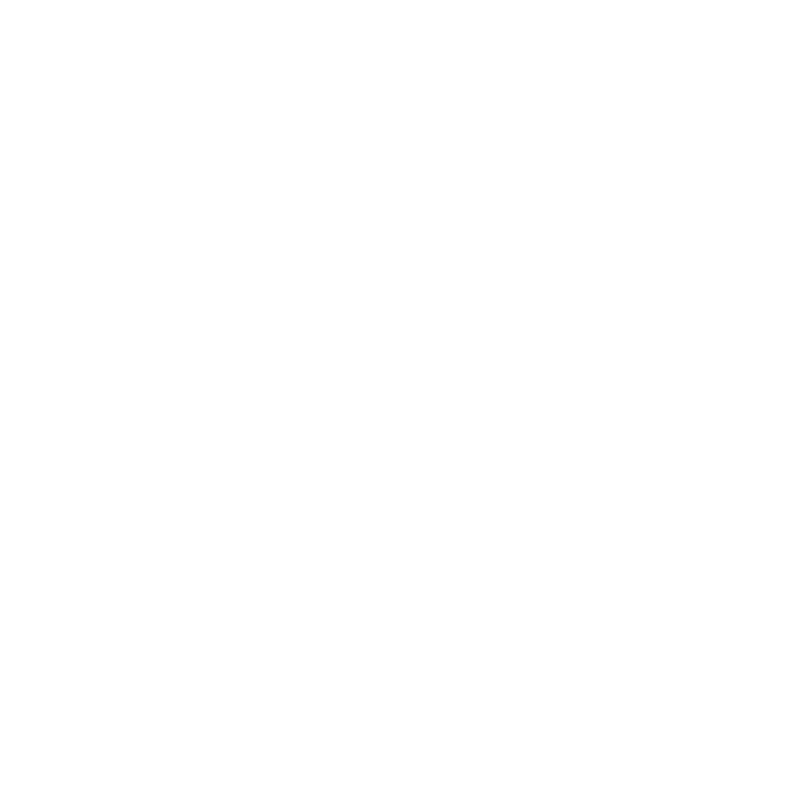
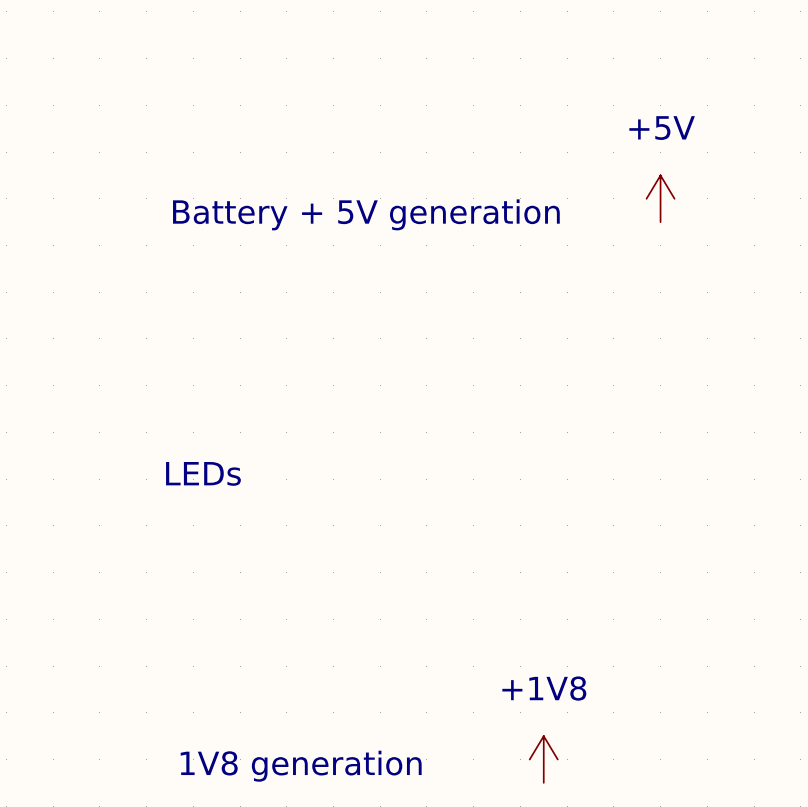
power symbol: none -> +5V (660, 198)
text: none -> Battery + 5V generation (366, 214)
text: none -> LEDs (203, 473)
power symbol: none -> +1V8 (543, 759)
text: none -> 1V8 generation (301, 766)

